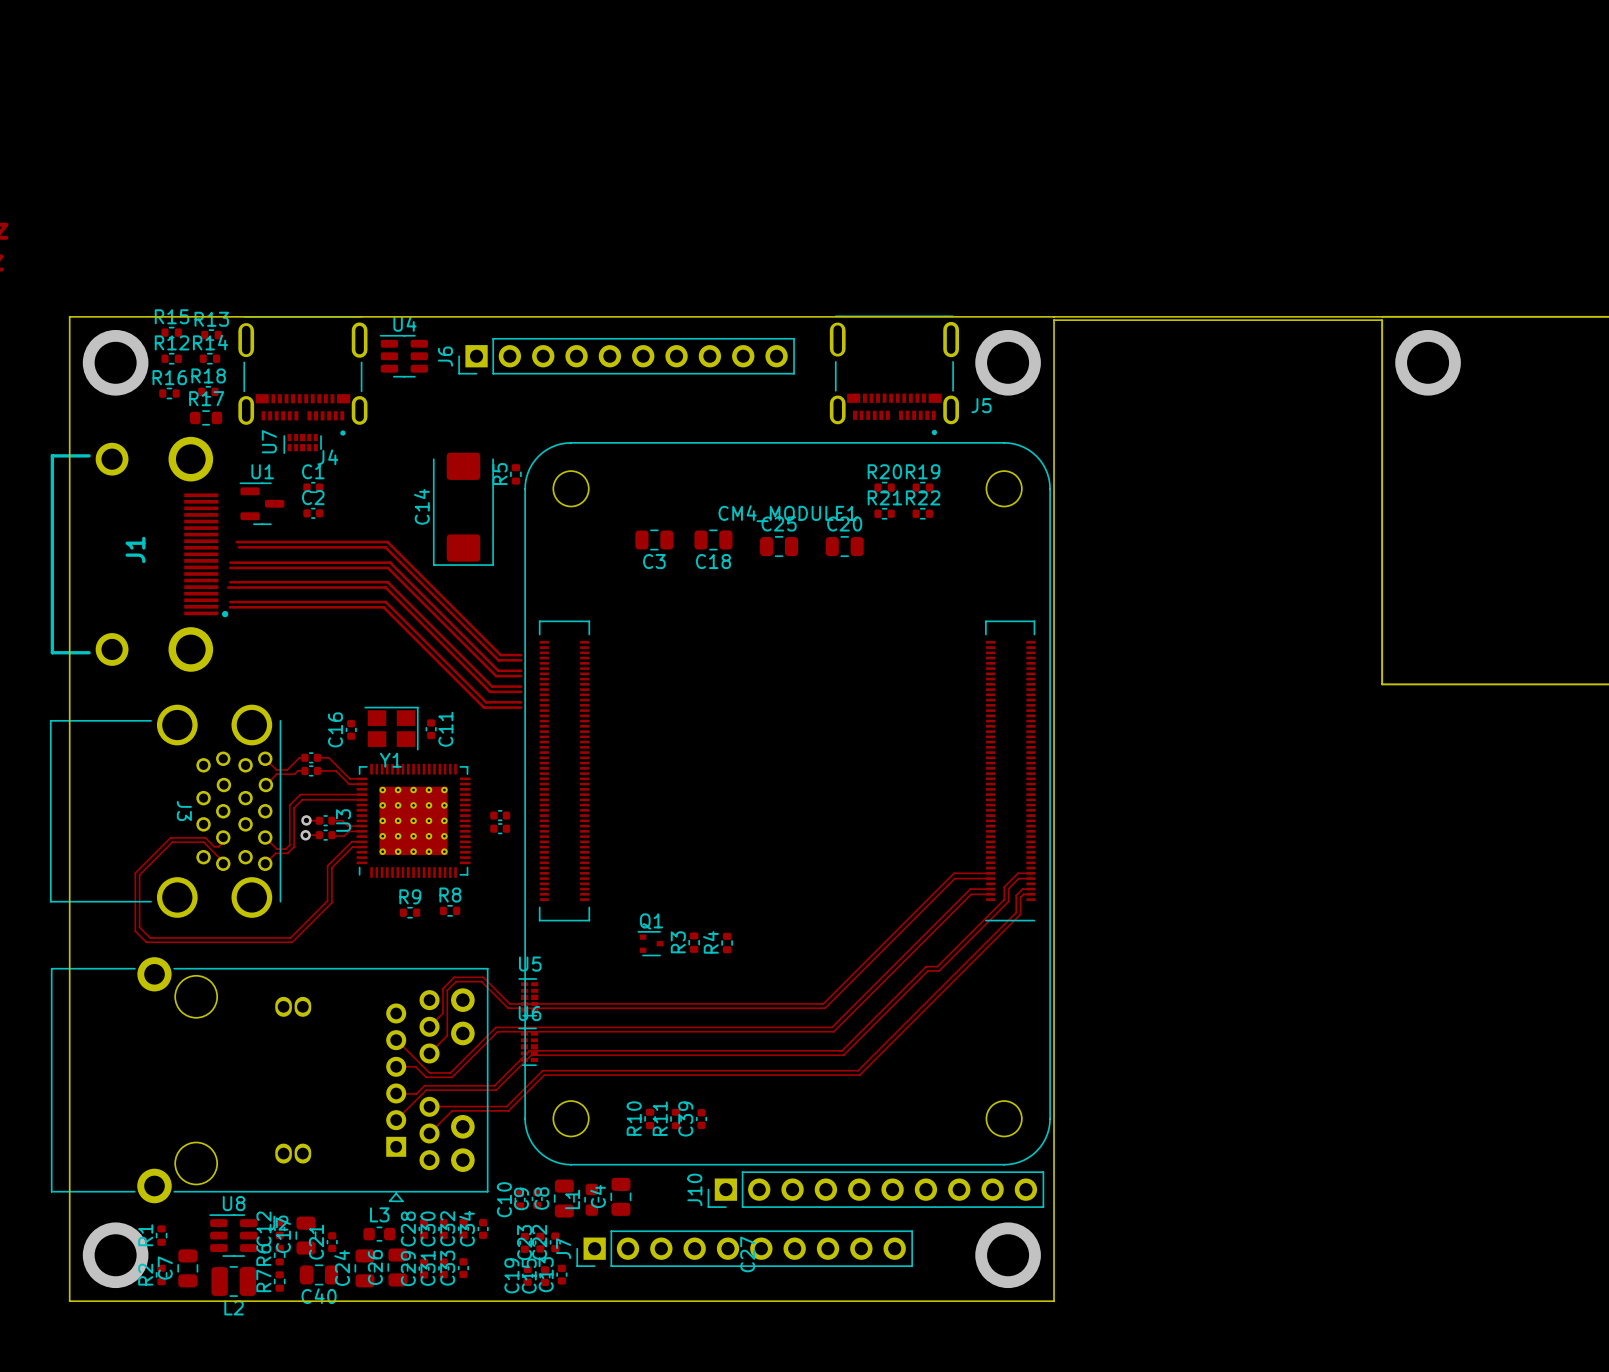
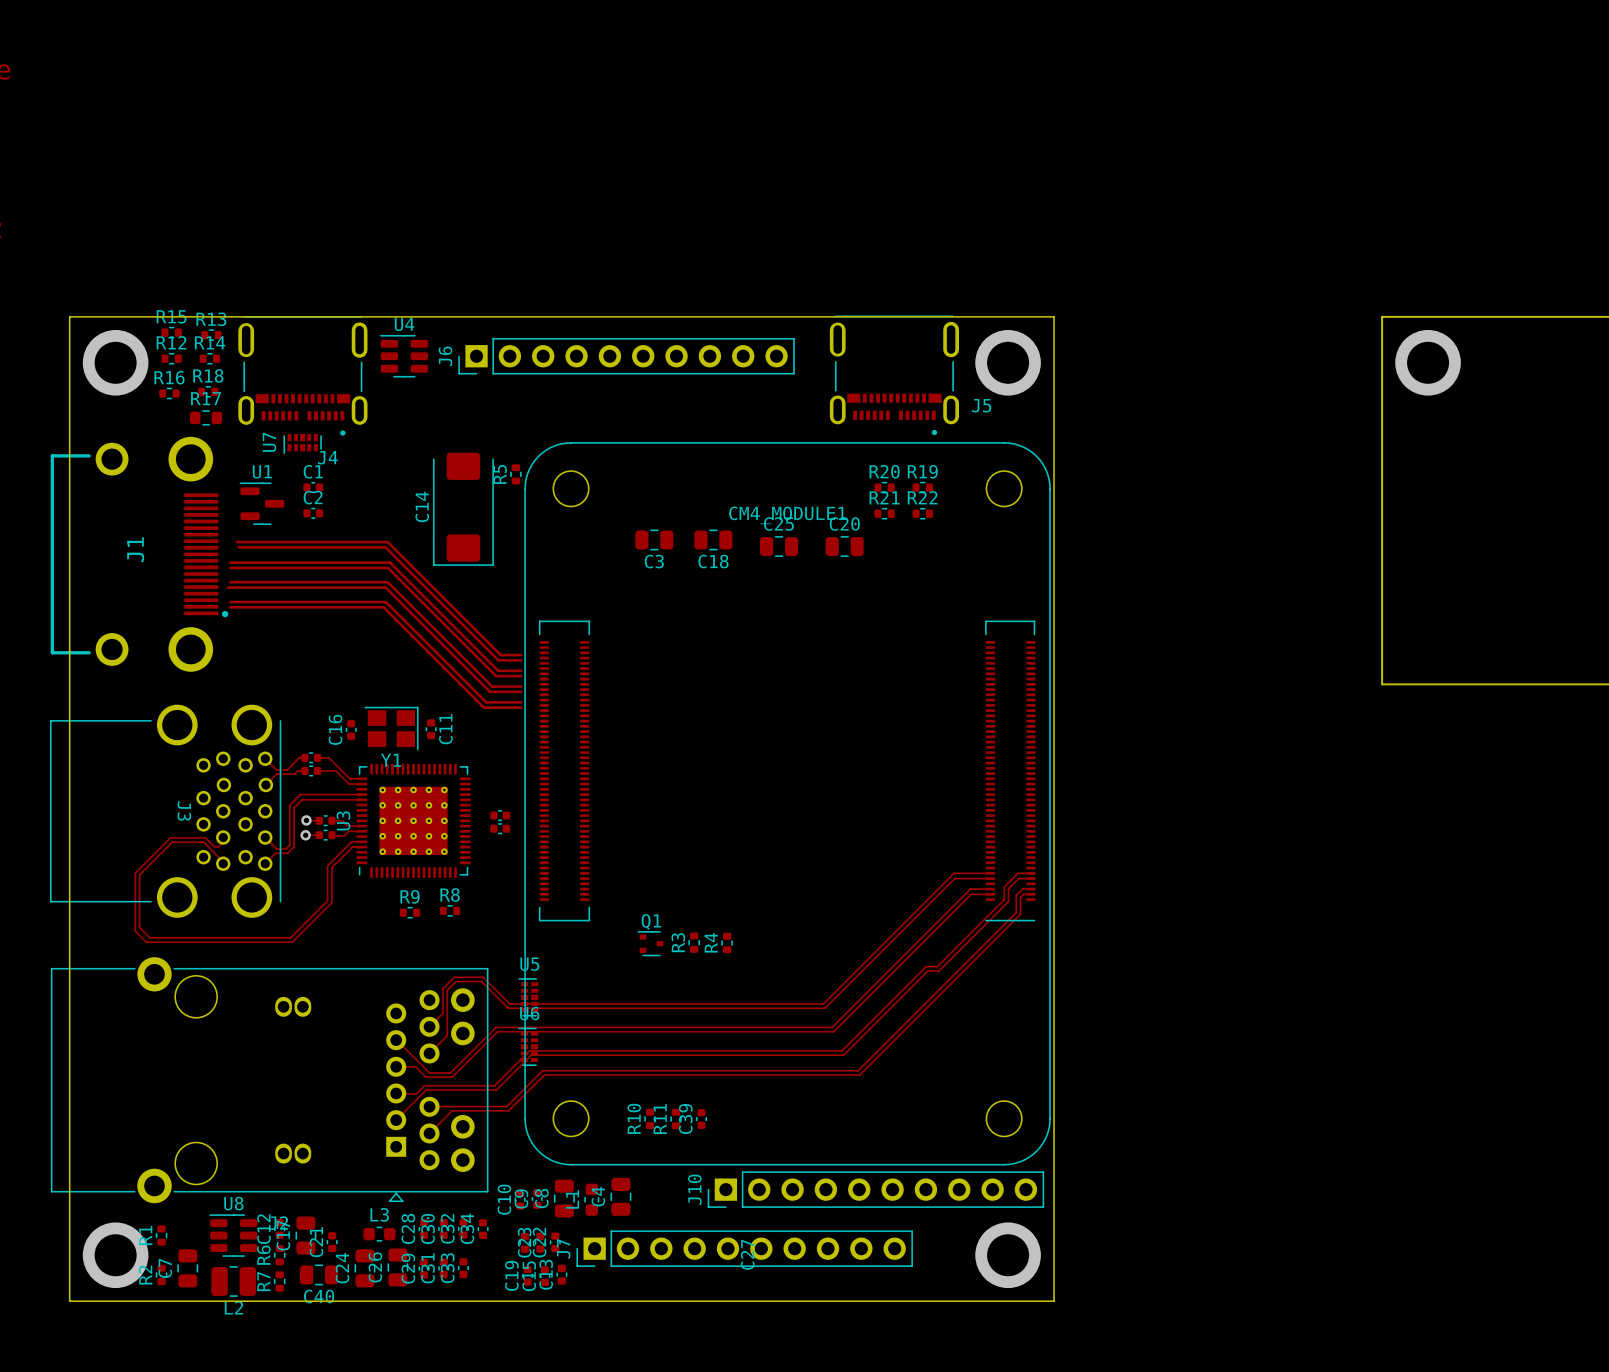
board edge: (1054, 316) (1382, 316) -> (1054, 316) (1054, 320)
board edge: (1054, 320) (1382, 320) -> (1382, 316) (1382, 320)

